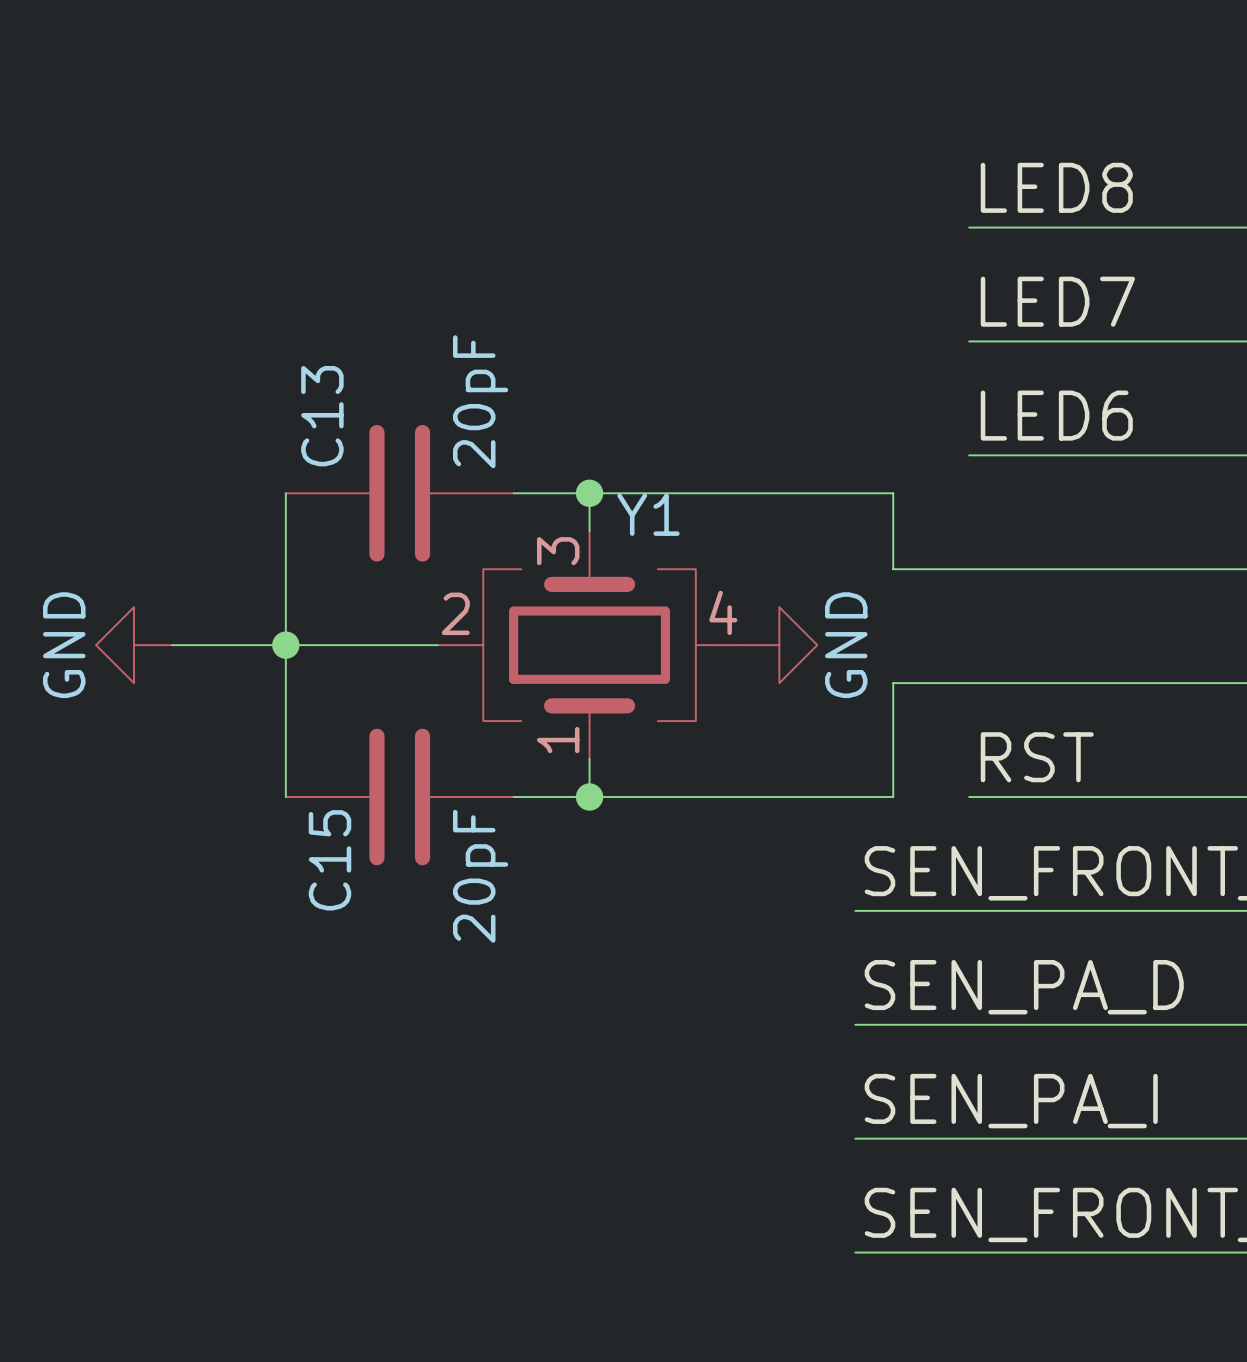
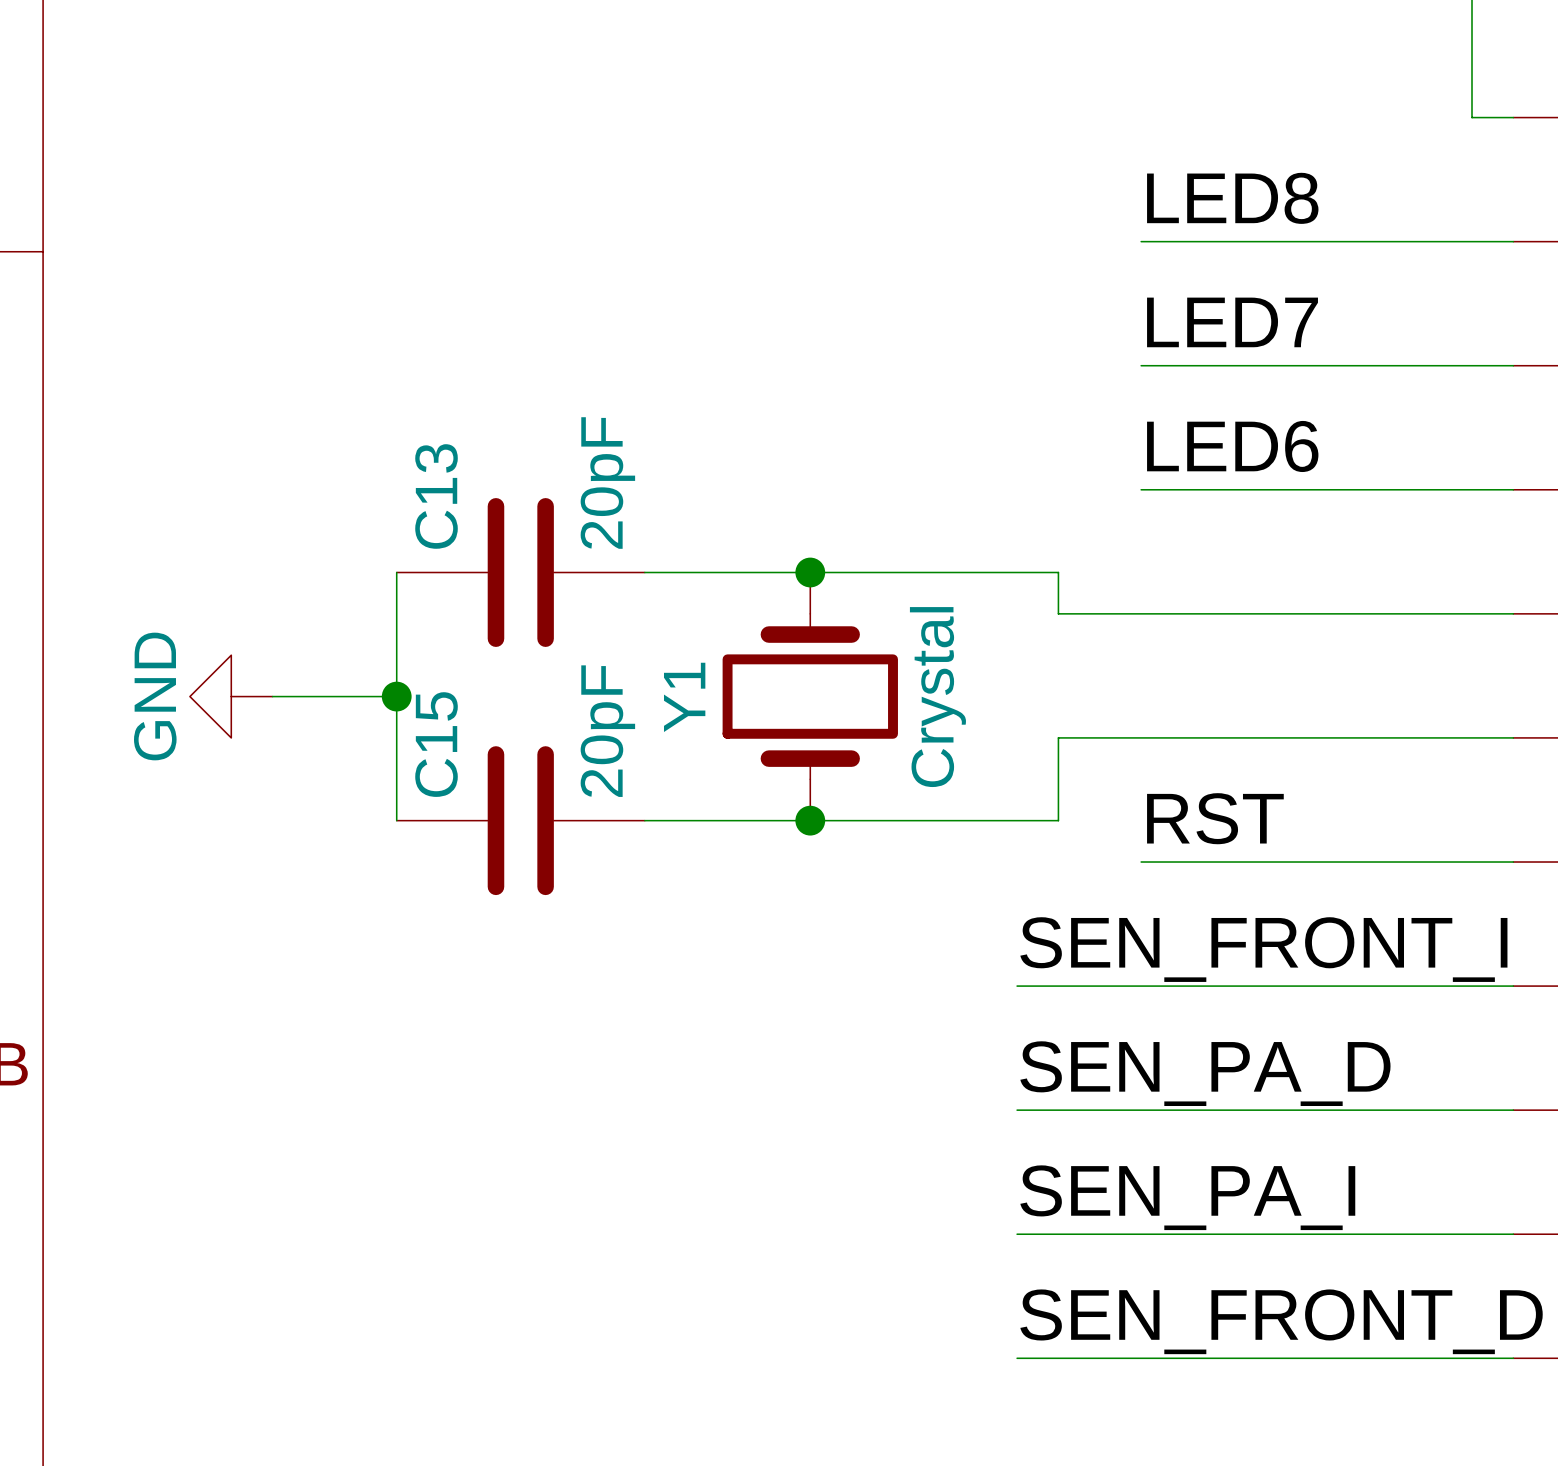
wire: (285, 493) (285, 531) -> none
C13 position: (399, 493) -> (520, 572)
wire: (513, 493) (893, 493) (893, 531) -> (644, 572) (1058, 572)
wire: (589, 493) (589, 531) -> none
junction position: (589, 493) -> (810, 572)
Y1 name position: Y1 (648, 514) -> Y1 (684, 697)
Y1 symbol: [437, 531, 742, 760] -> [722, 572, 898, 821]
Y1 value: none -> Crystal (937, 697)
wire: (285, 645) (437, 645) -> none
power symbol: GND (779, 645) -> none
wire: (285, 759) (285, 796) -> none
wire: (589, 759) (589, 796) -> none
wire: (893, 759) (893, 796) (513, 796) -> (1058, 820) (644, 820)
C15 position: (399, 796) -> (520, 820)
junction position: (589, 796) -> (810, 820)
C15 name position: C15 (329, 860) -> C15 (436, 744)
C15 value position: 20pF (480, 876) -> 20pF (607, 731)

